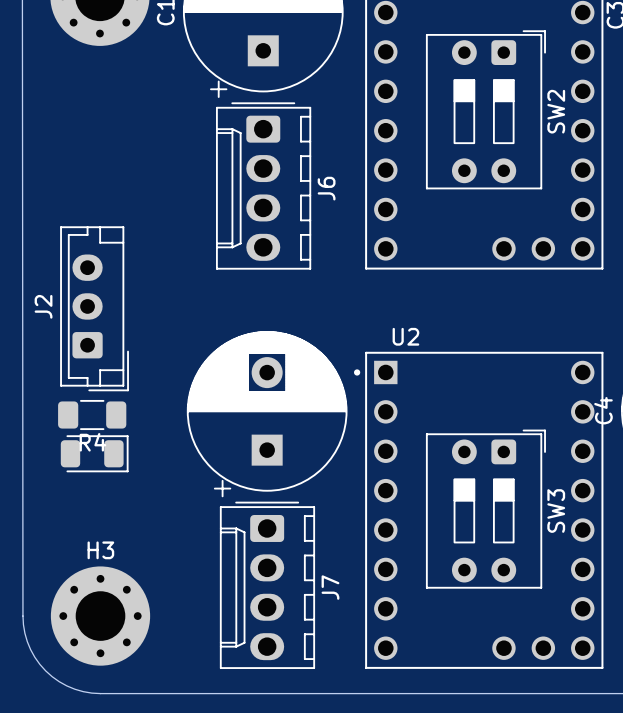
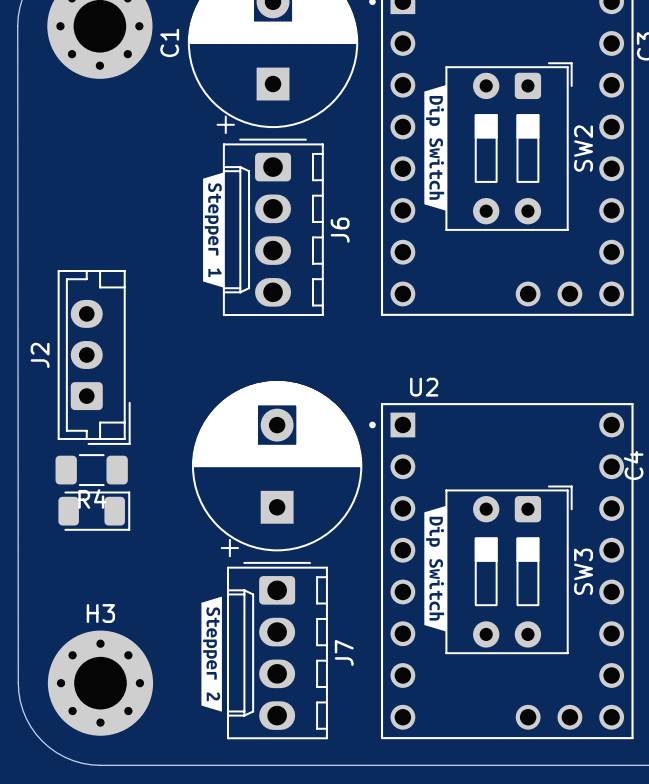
drawing: none -> [424, 85, 447, 211]
drawing: none -> [203, 172, 224, 288]
drawing: none -> [424, 505, 447, 632]
drawing: none -> [201, 596, 222, 712]

